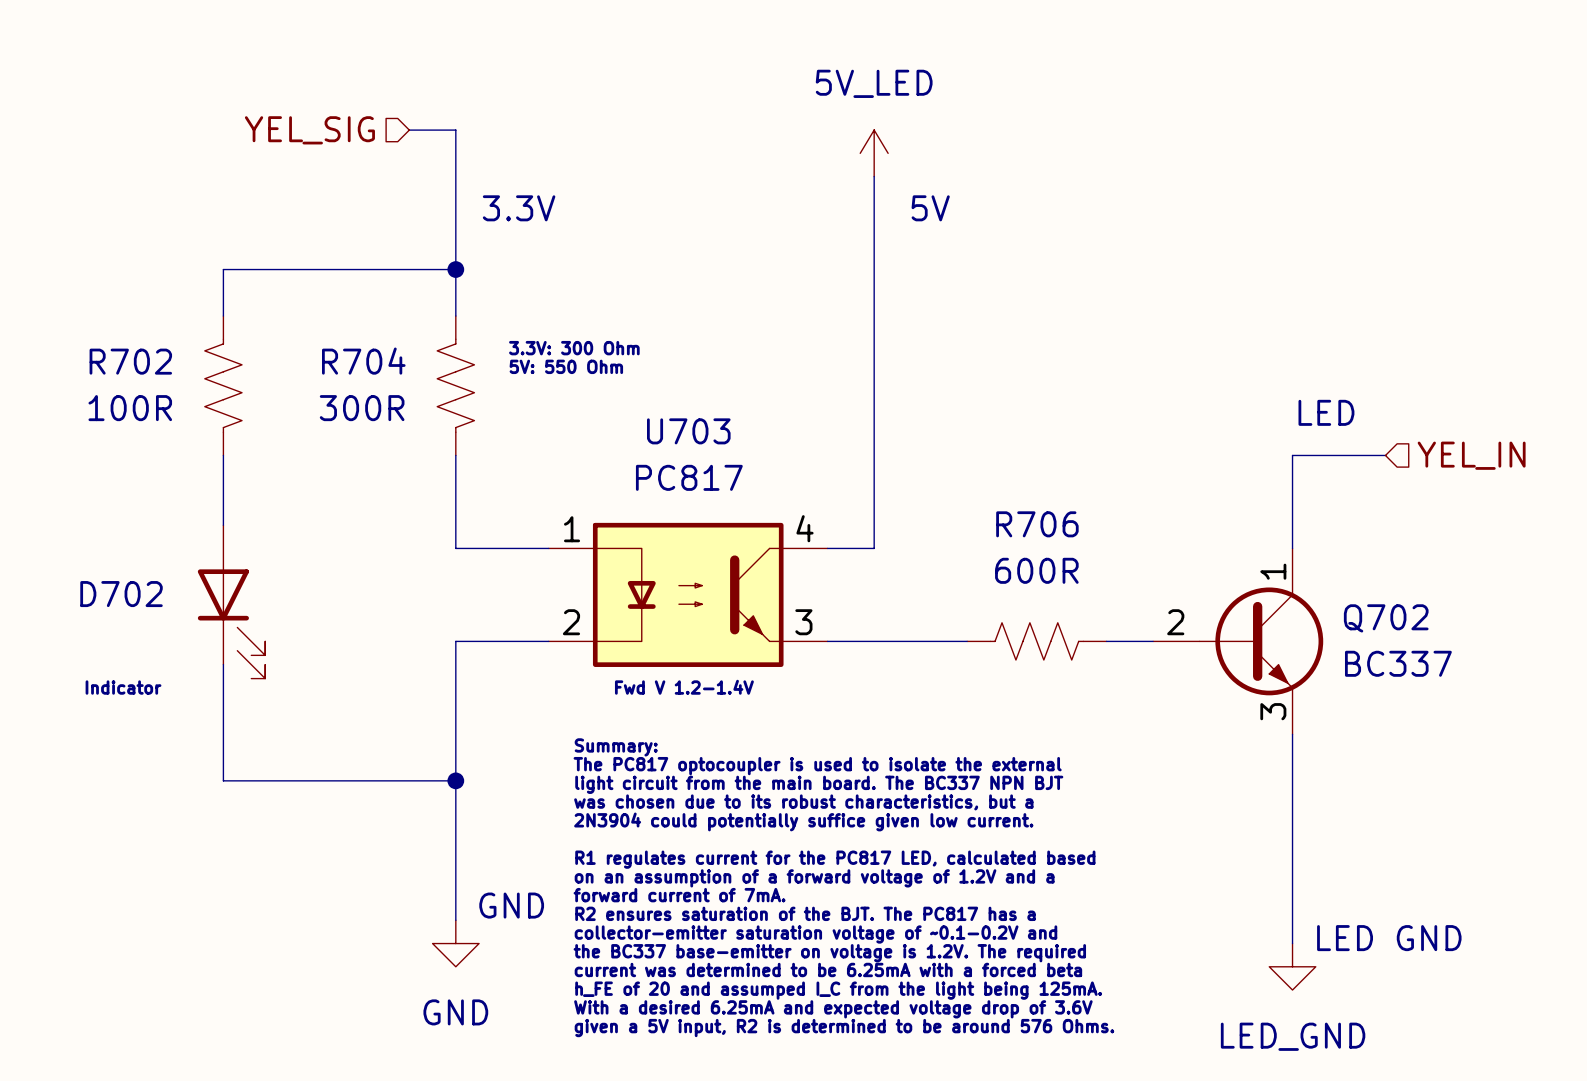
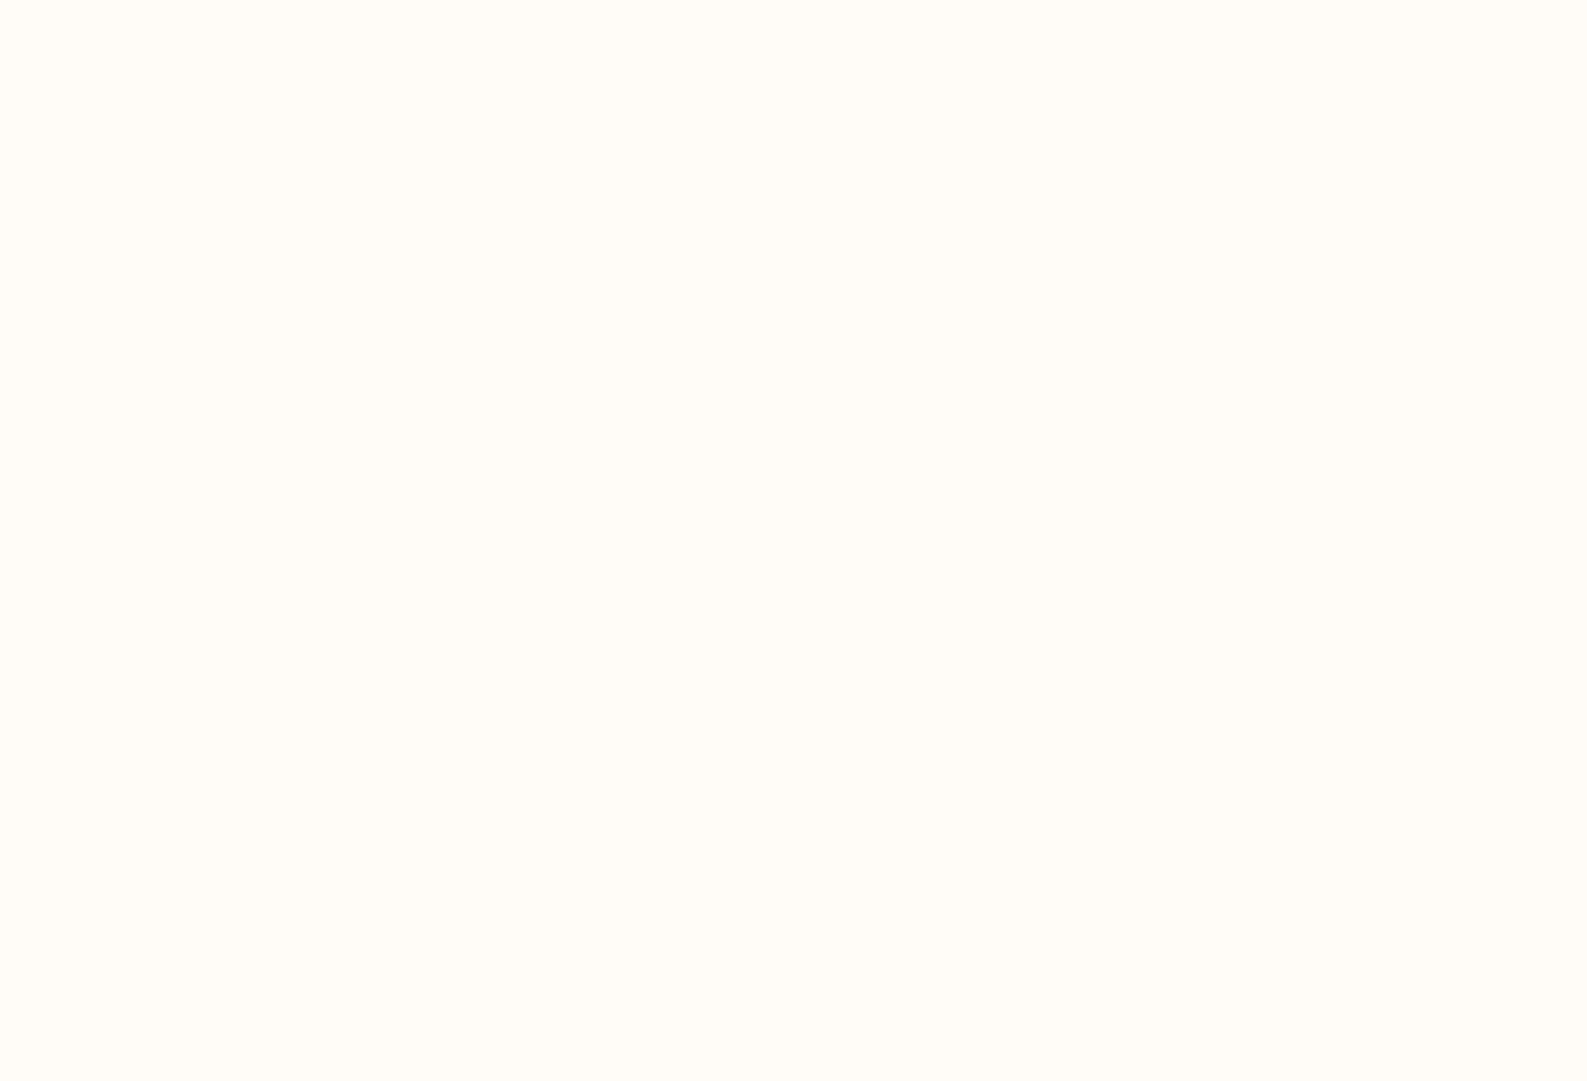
hierarchical label: YEL_SIG (309, 130) -> none
wire: (409, 130) (455, 130) (455, 316) -> none
power symbol: 5V_LED (874, 153) -> none
wire: (874, 176) (874, 548) (827, 548) -> none
text: 3.3V (519, 208) -> none
text: 5V (930, 208) -> none
wire: (455, 269) (223, 269) (223, 316) -> none
junction: (455, 269) -> none
text: 3.3V: 300 Ohm (574, 348) -> none
text: 5V: 550 Ohm (566, 366) -> none
R702: 100R (223, 385) -> none
R704: 300R (455, 385) -> none
text: LED (1326, 412) -> none
wire: (223, 455) (223, 525) -> none
wire: (455, 455) (455, 548) (548, 548) -> none
wire: (1385, 455) (1292, 455) (1292, 548) -> none
hierarchical label: YEL_IN (1471, 455) -> none
U703: PC817 (688, 594) -> none
D702: (231, 601) -> none
wire: (548, 641) (455, 641) (455, 920) -> none
wire: (827, 641) (967, 641) -> none
R706: 600R (1036, 641) -> none
wire: (1106, 641) (1153, 641) -> none
Q702: BC337 (1238, 641) -> none
wire: (223, 664) (223, 780) (455, 780) -> none
text: Indicator (123, 687) -> none
text: Fwd V 1.2-1.4V (684, 687) -> none
wire: (1292, 734) (1292, 943) -> none
text: Summary: (616, 747) -> none
text: The PC817 optocoupler is used to isolate the external (817, 766) -> none
junction: (455, 780) -> none
text: light circuit from the main board. The BC337 NPN BJT (819, 784) -> none
text: was chosen due to its robust characteristics, but a (803, 802) -> none
text: 2N3904 could potentially suffice given low current. (803, 821) -> none
text: R1 regulates current for the PC817 LED, calculated based (835, 859) -> none
text: on an assumption of a forward voltage of 1.2V and a (814, 878) -> none
text: forward current of 7mA. (679, 895) -> none
text: GND (511, 905) -> none
text: R2 ensures saturation of the BJT. The PC817 has a (805, 913) -> none
text: collector-emitter saturation voltage of ~0.1-0.2V and (815, 934) -> none
text: LED GND (1389, 938) -> none
power symbol: GND (455, 943) -> none
text: the BC337 base-emitter on voltage is 1.2V. The required (829, 953) -> none
power symbol: LED_GND (1292, 966) -> none
text: current was determined to be 6.25mA with a forced beta (828, 969) -> none
text: h_FE of 20 and assumped I_C from the light being 125mA. (838, 990) -> none
text: With a desired 6.25mA and expected voltage drop of 3.6V (833, 1009) -> none
text: given a 5V input, R2 is determined to be around 576 Ohms. (844, 1028) -> none

